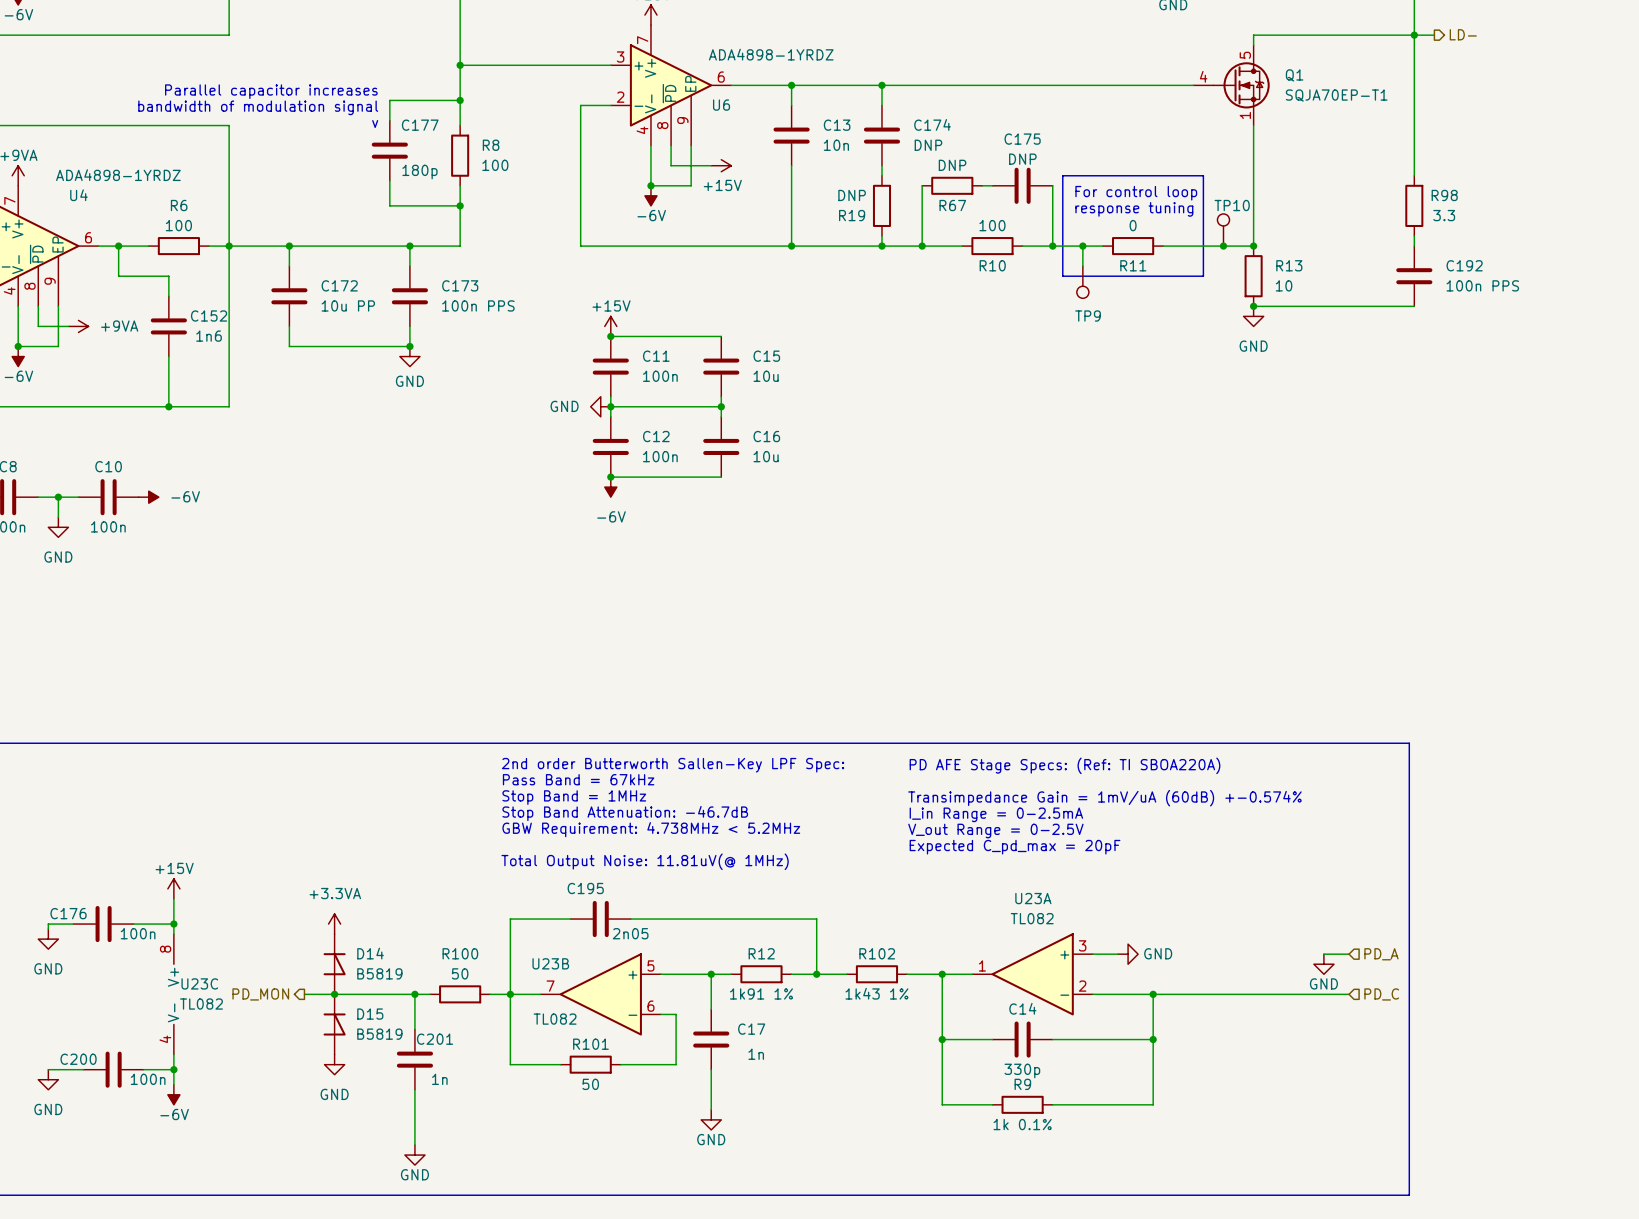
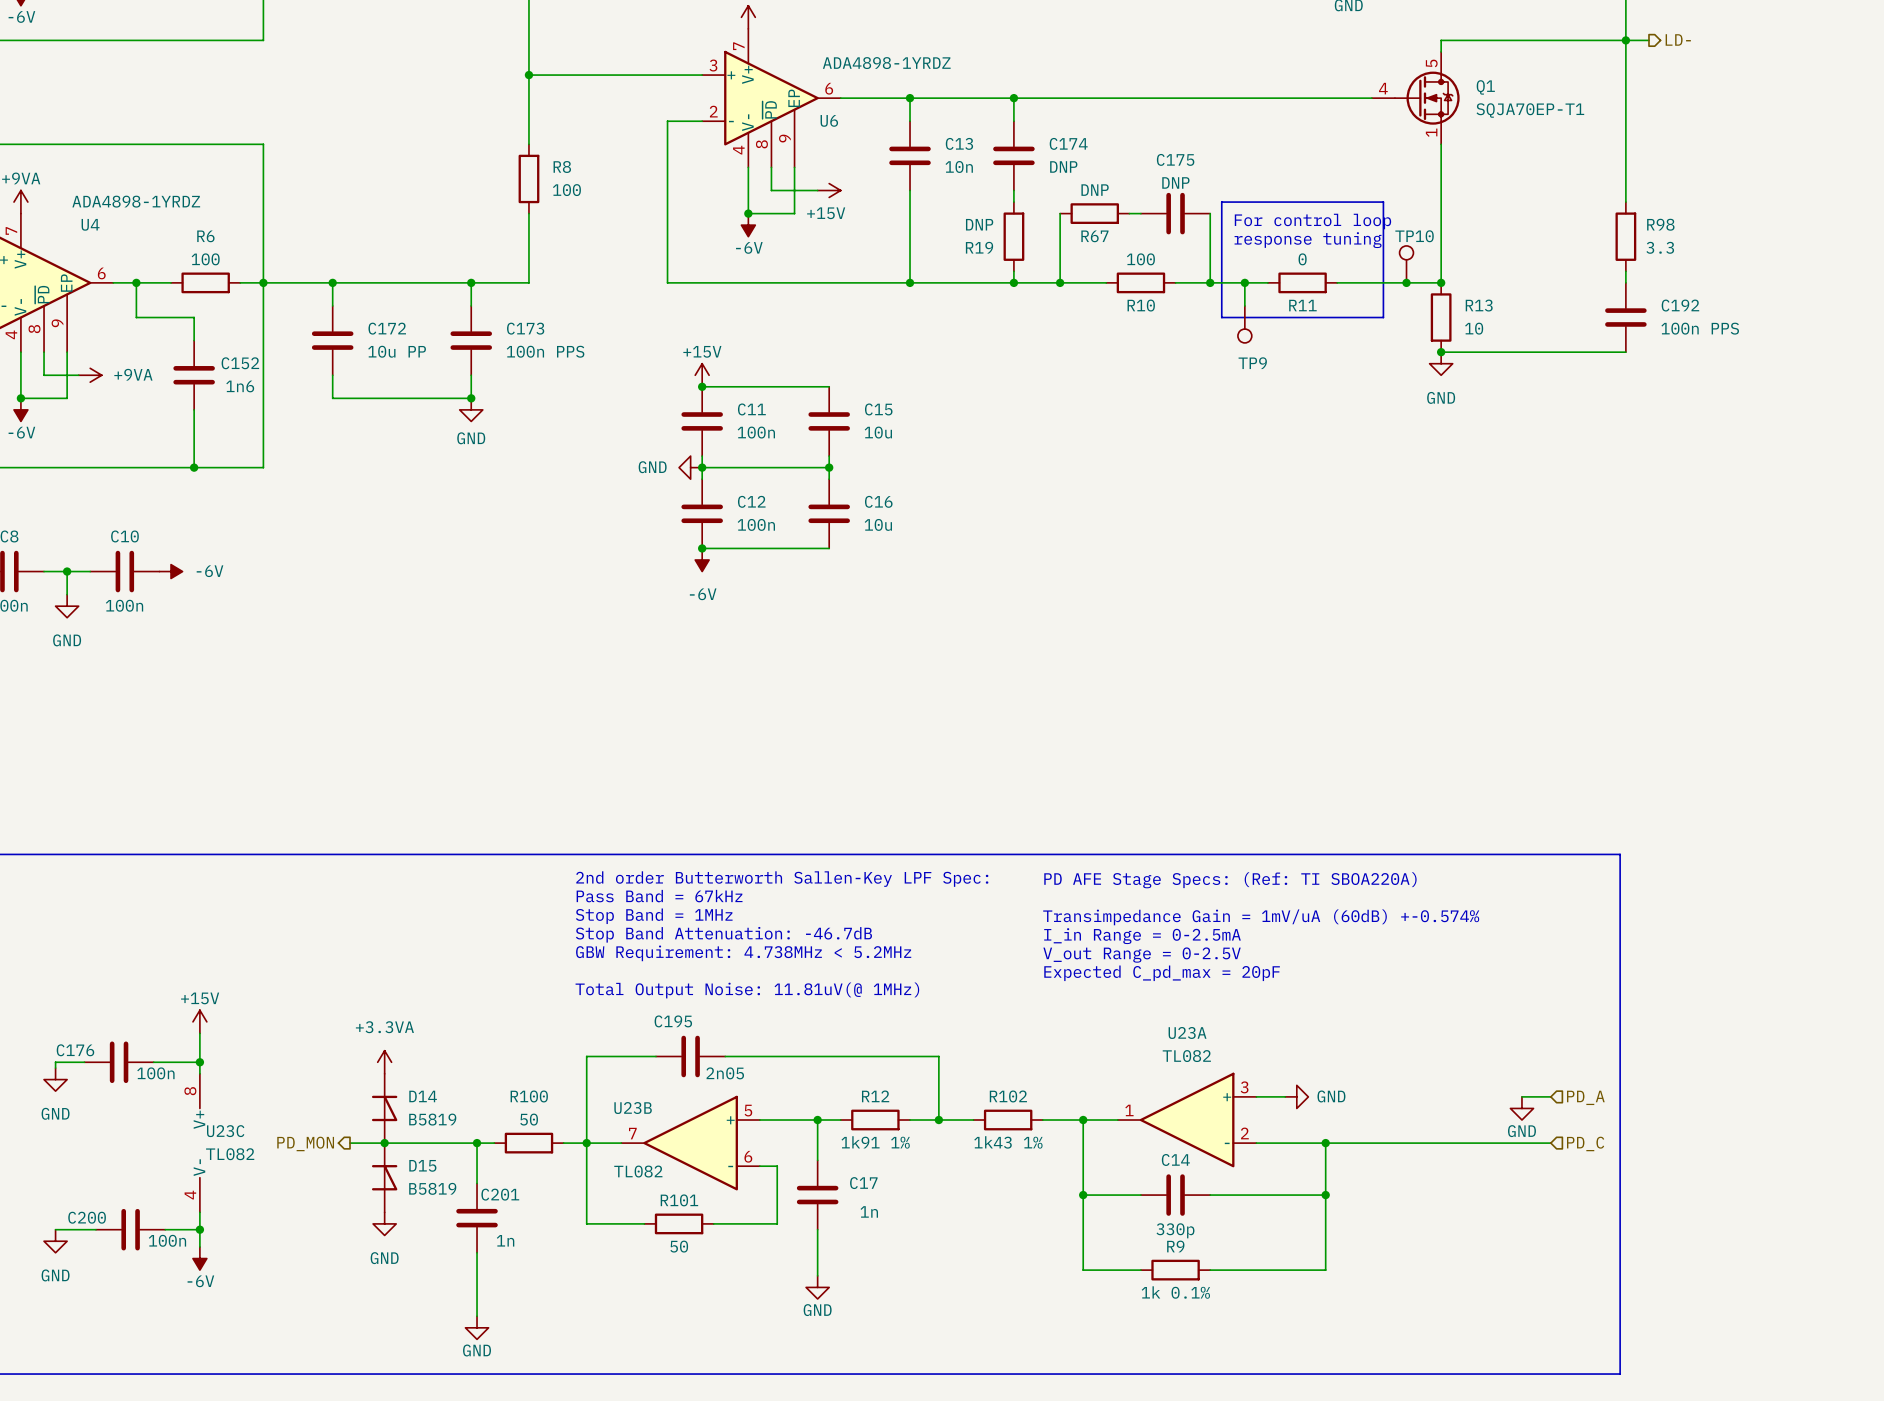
text: Parallel capacitor increases (271, 91) -> none
wire: (460, 100) (389, 100) (389, 120) -> none
junction: (460, 100) -> none
text: bandwidth of modulation signal (258, 107) -> none
text: v (375, 124) -> none
C177: 180p (389, 150) -> none
wire: (389, 180) (389, 205) (460, 205) -> none
junction: (460, 205) -> none

